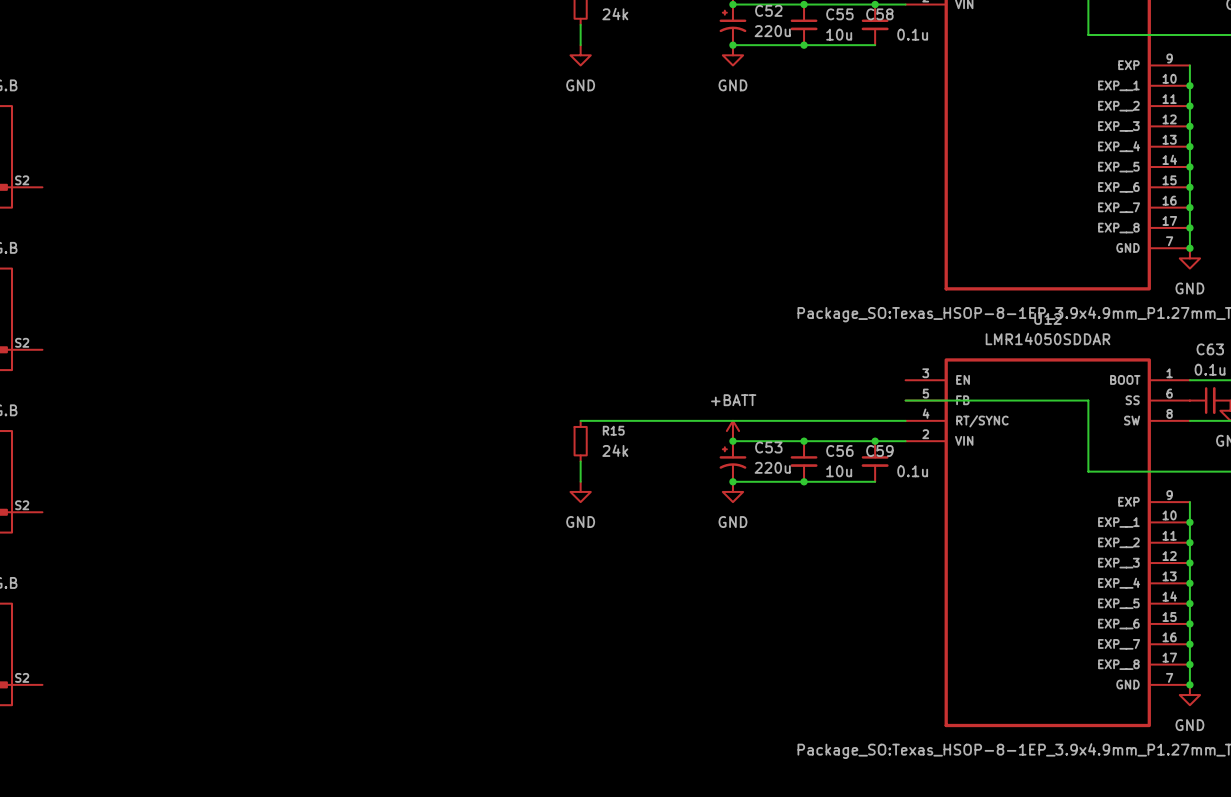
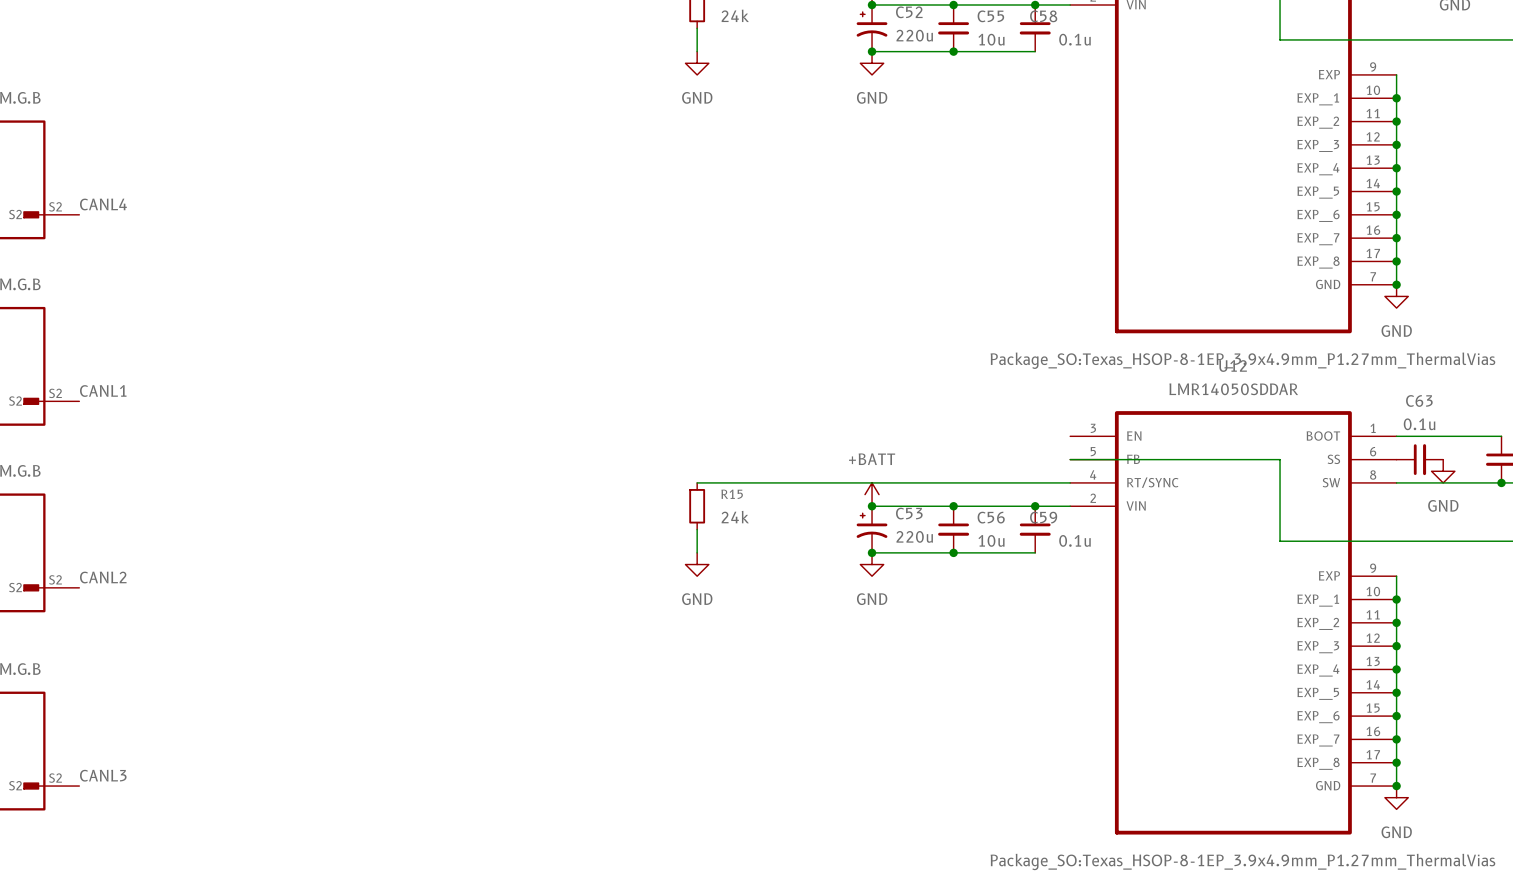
label: none -> CANL4 (103, 204)
label: none -> CANL1 (103, 391)
label: none -> CANL2 (103, 577)
label: none -> CANL3 (103, 775)

